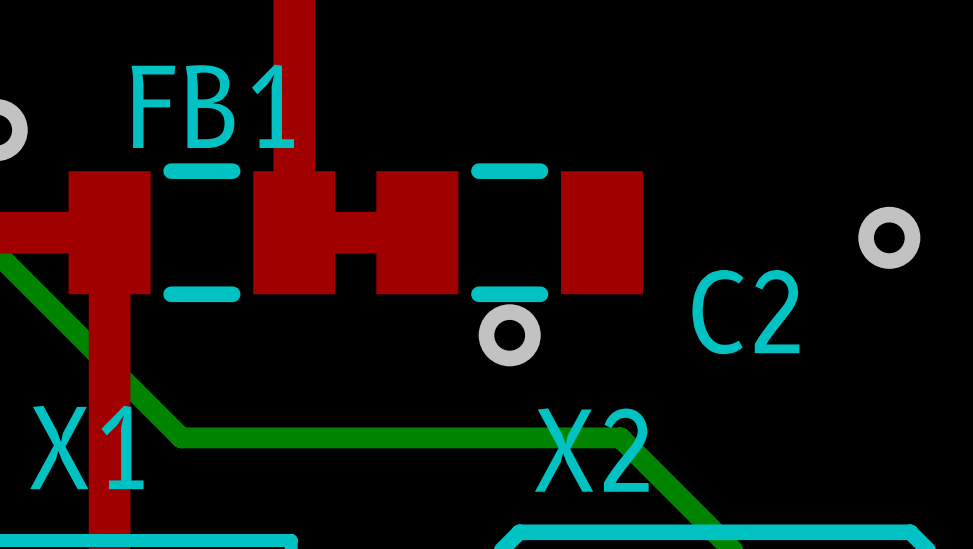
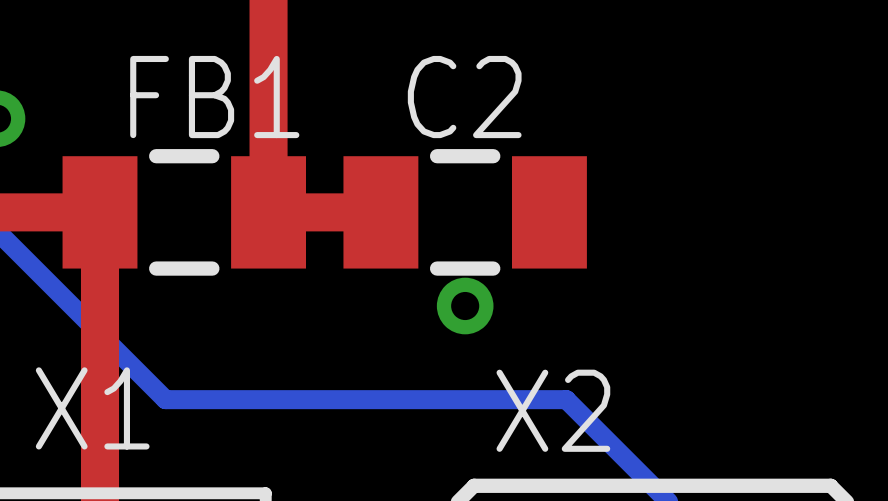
via: (889, 237) -> none
C2 name position: C2 (745, 312) -> C2 (464, 97)

